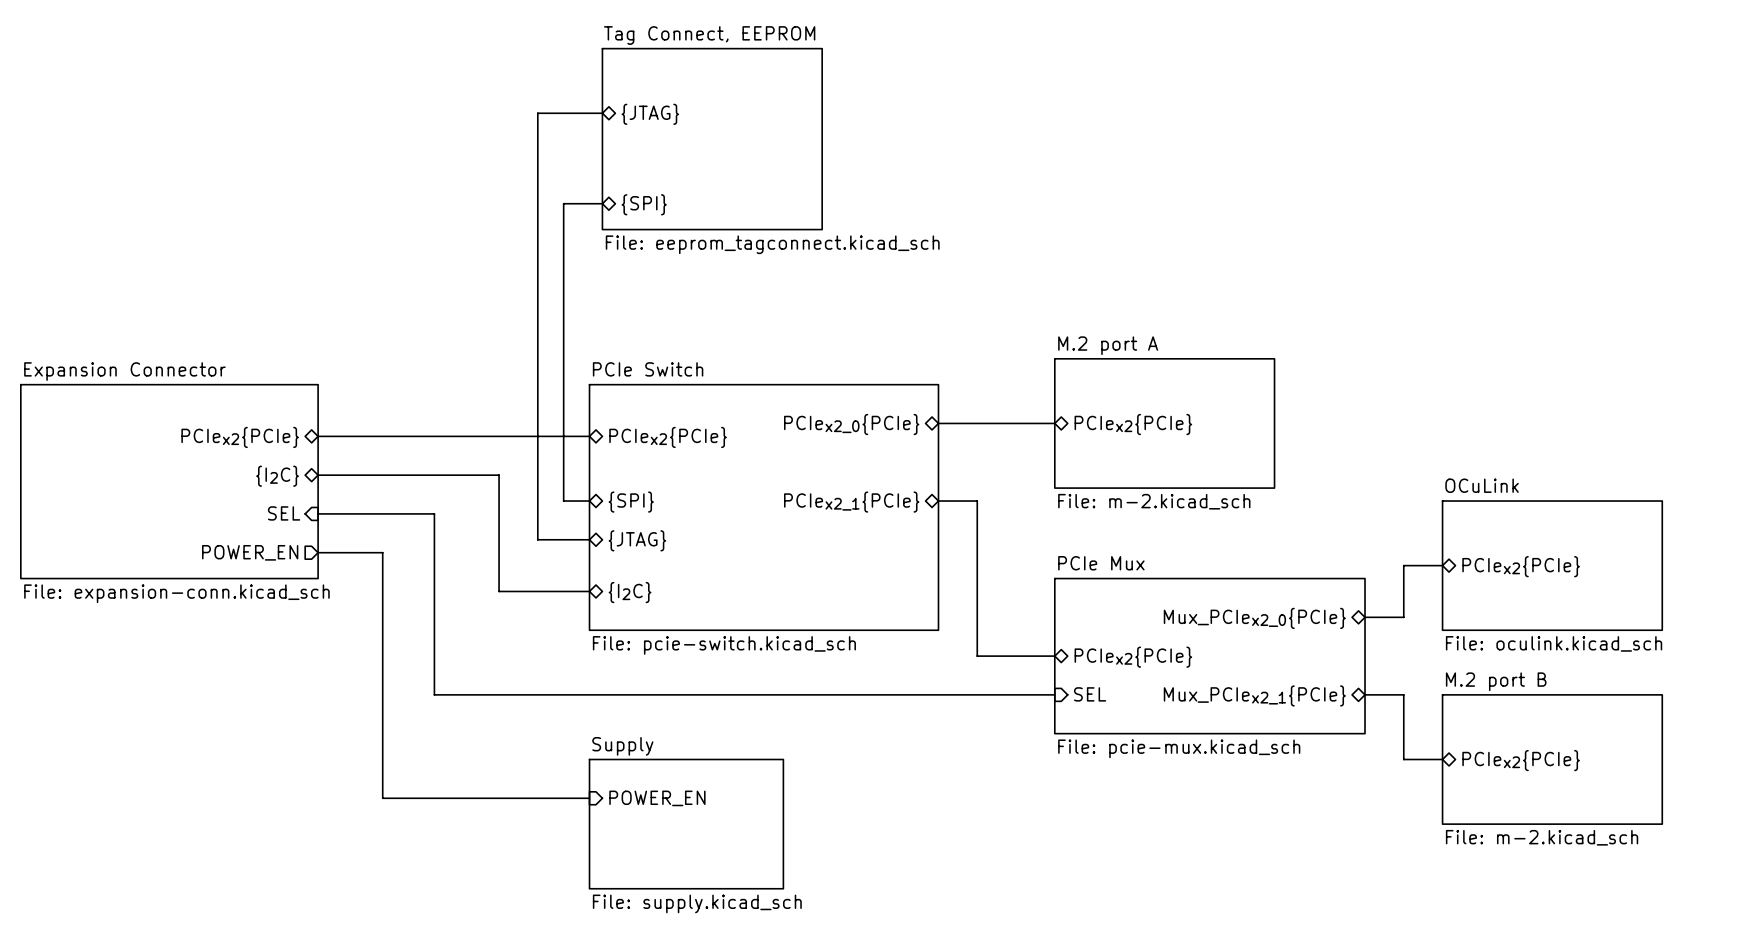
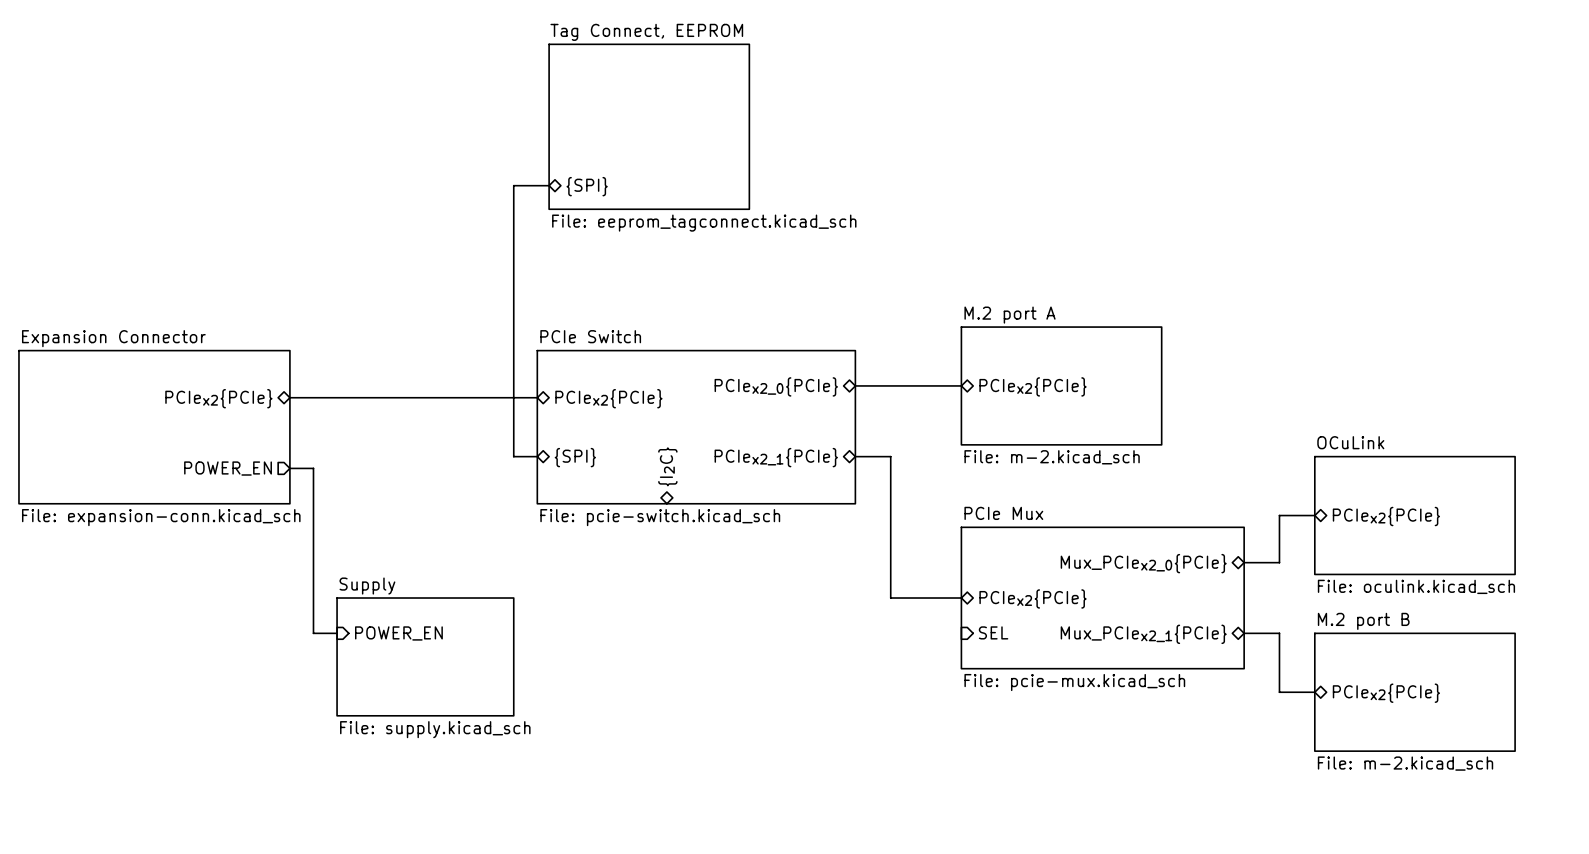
bus: (602, 113) (537, 113) (537, 539) (589, 539) -> none
sheet pin: {JTAG} (650, 114) -> none
sheet Expansion Connector: none -> File: expansion-conn.kicad_sch (154, 427)
sheet PCIe Switch: none -> File: pcie-switch.kicad_sch (696, 427)
bus: (318, 475) (499, 475) (499, 591) (589, 591) -> none
sheet pin: {I2C} (277, 476) -> none
sheet Expansion Connector: File: expansion-conn.kicad_sch (169, 481) -> none
sheet PCIe Switch: File: pcie-switch.kicad_sch (764, 507) -> none
sheet pin shape: input (284, 513) -> output (228, 468)
sheet pin: SEL (284, 513) -> POWER_EN (228, 468)
wire: (343, 513) (434, 513) (434, 694) (1054, 694) -> (313, 468) (313, 633) (337, 633)
sheet pin: {JTAG} (637, 540) -> none
sheet pin: POWER_EN (250, 552) -> none
wire: (318, 552) (382, 552) (382, 798) (589, 798) -> none
sheet pin rotation: 0° (630, 592) -> 90° counterclockwise (667, 466)
sheet pin position: {I2C} (630, 592) -> {I2C} (667, 466)
sheet pin: none -> POWER_EN (398, 633)
sheet pin: POWER_EN (657, 798) -> none
sheet Supply position: (686, 824) -> (425, 656)

